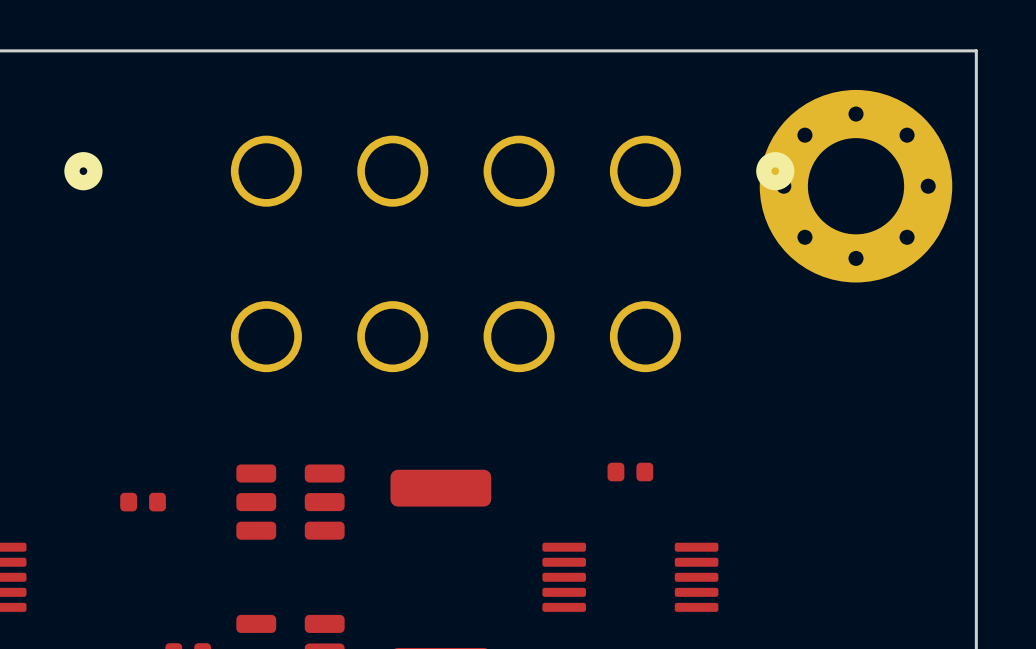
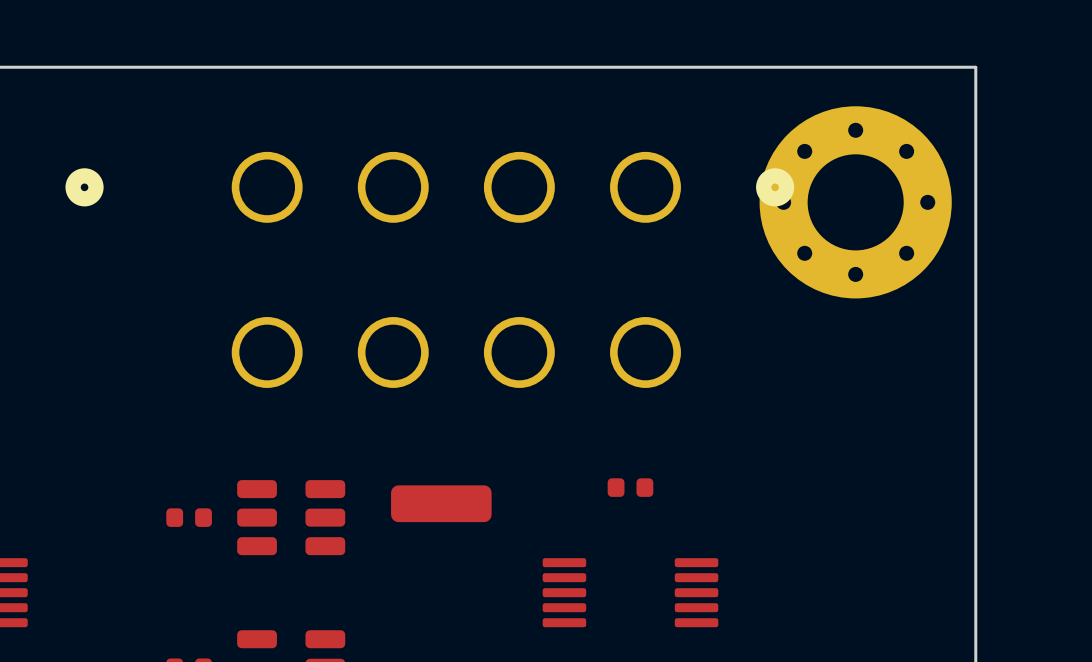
part position: (143, 502) -> (189, 517)

